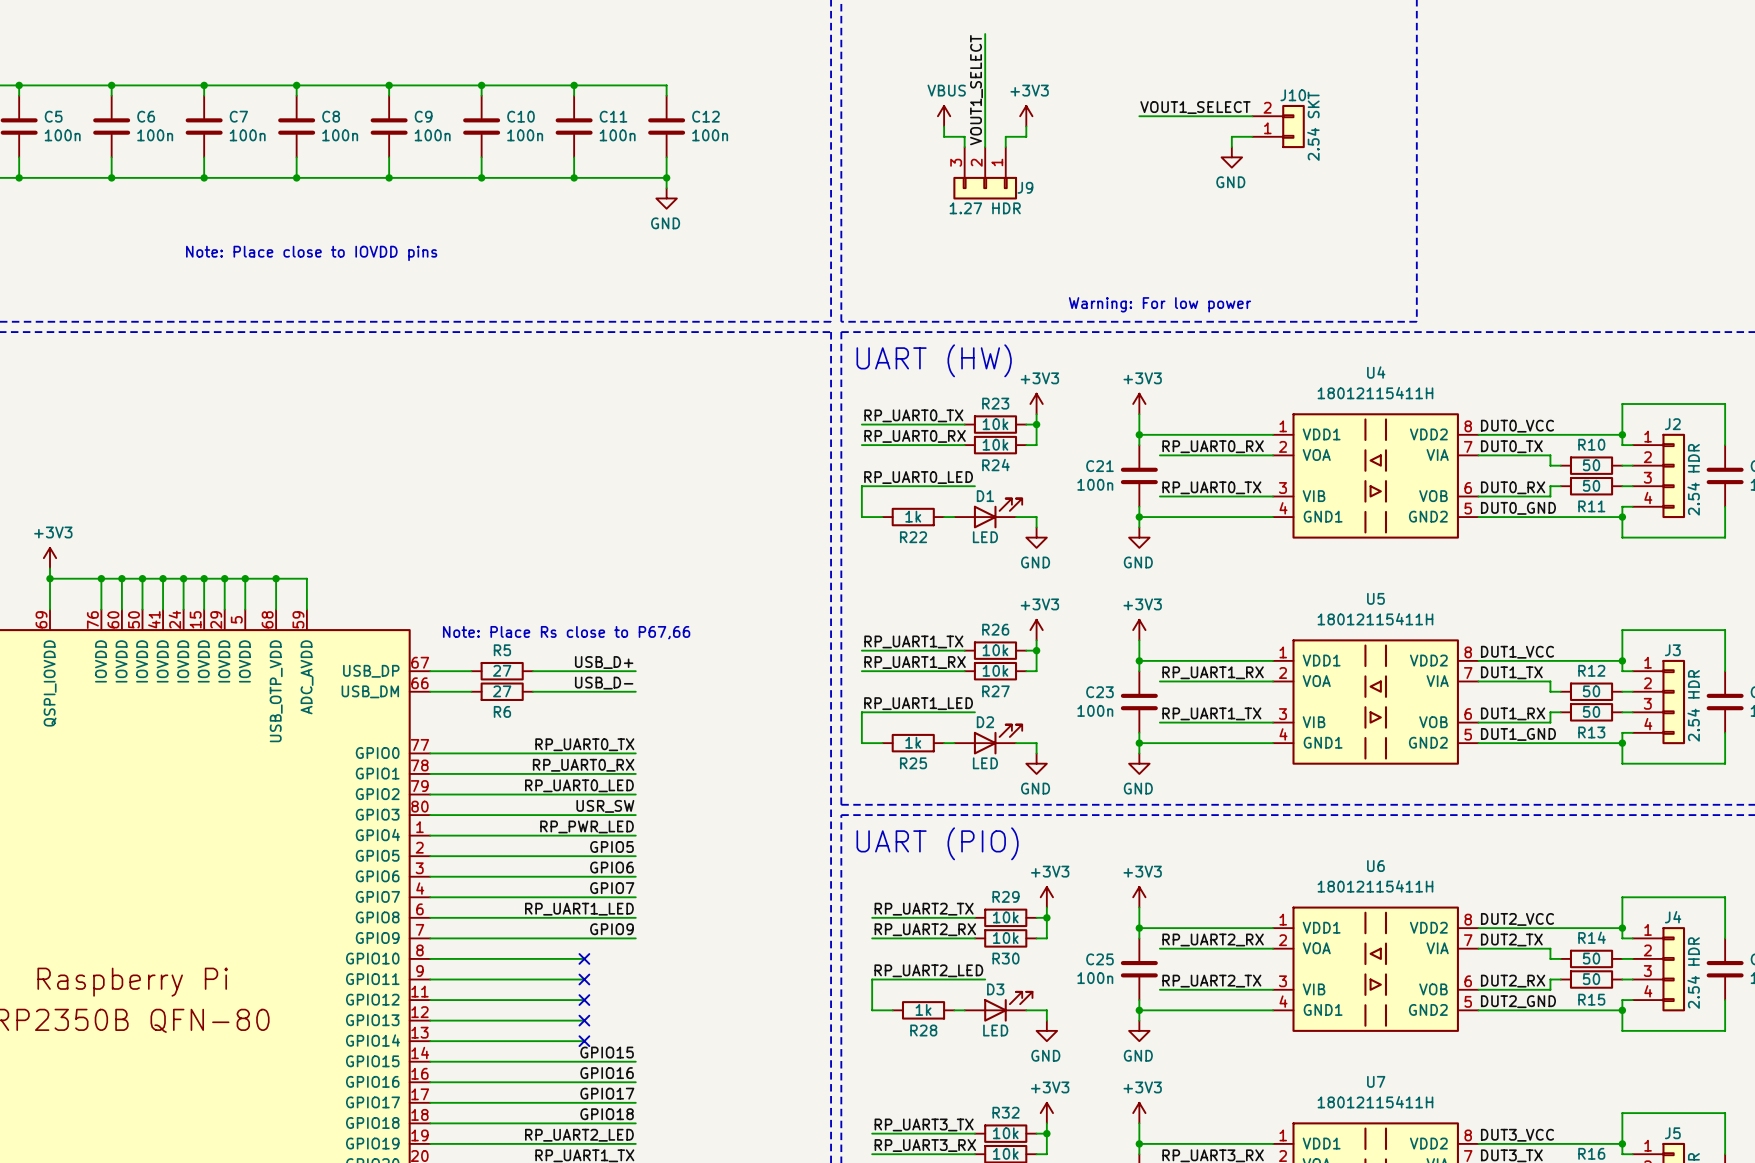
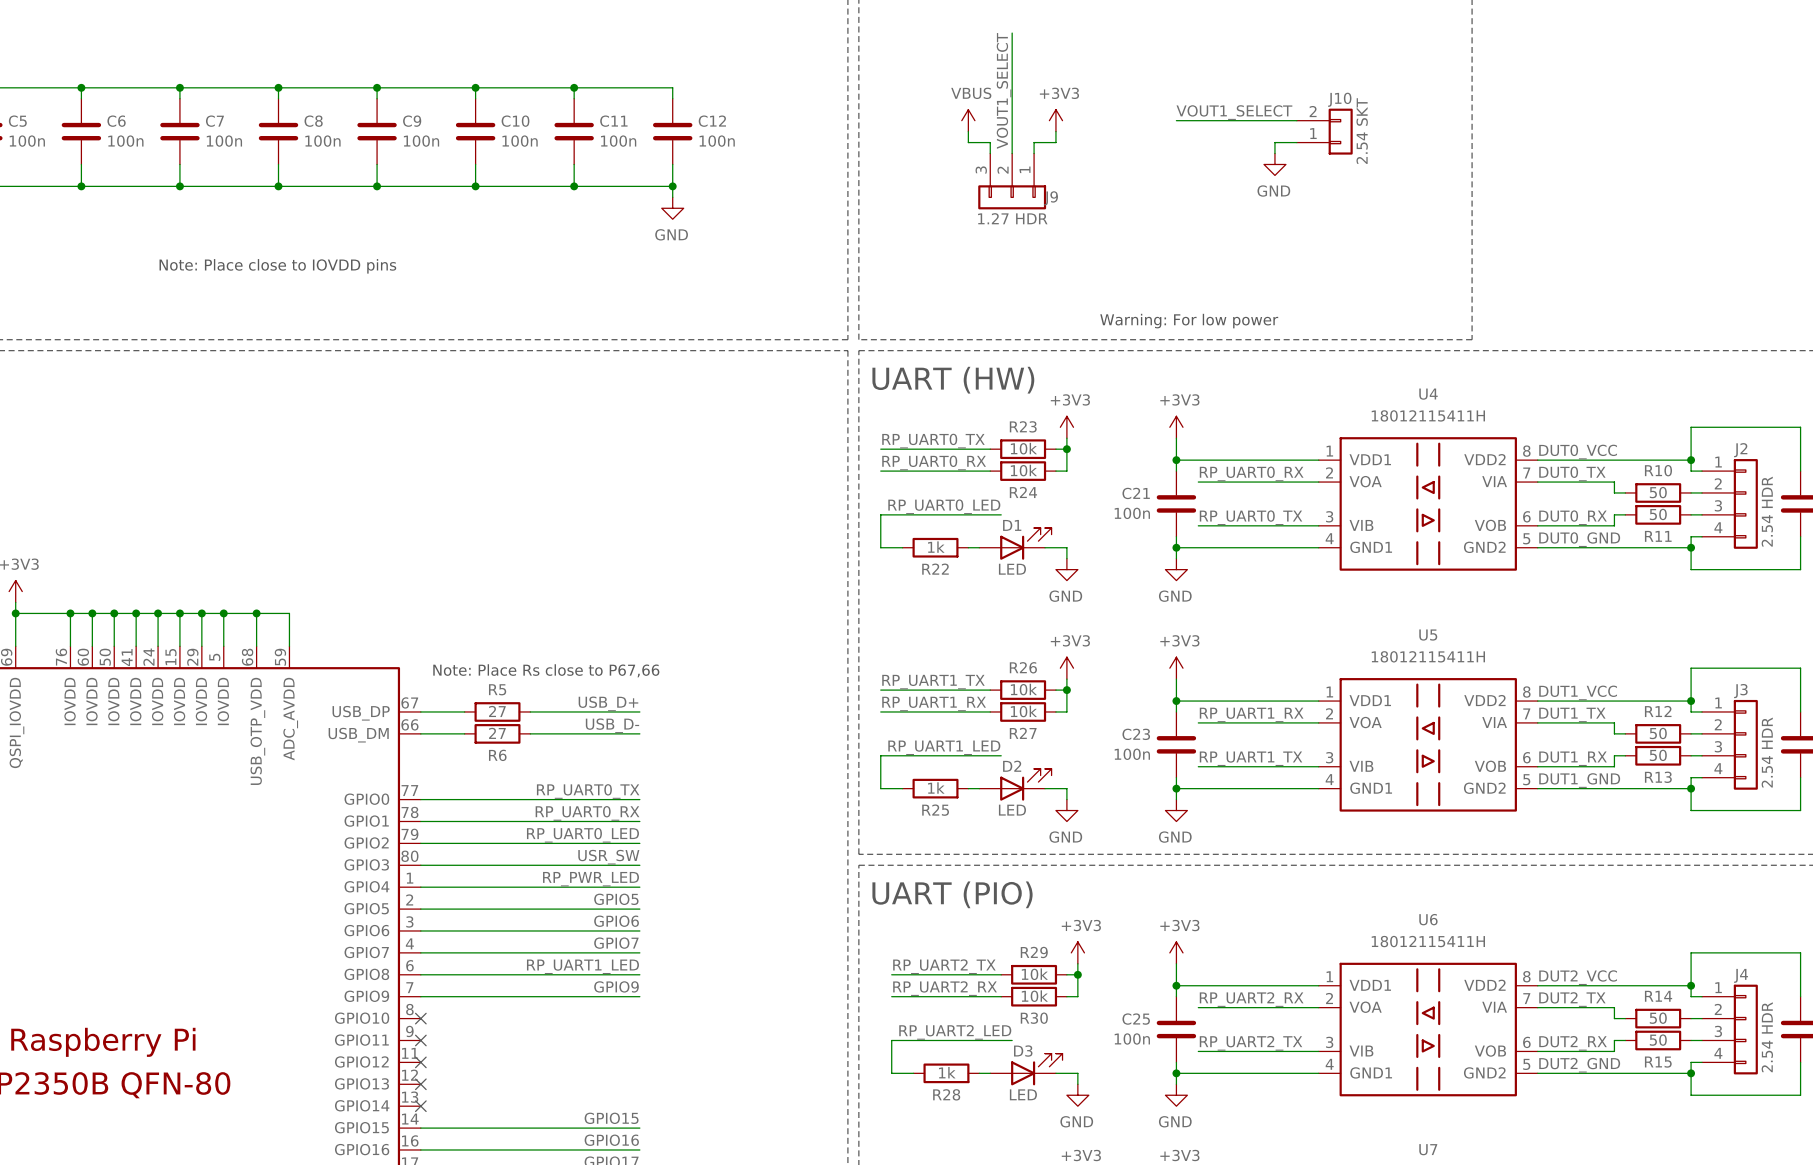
wire: (430, 958) (584, 958) -> none
no-connect mark: none -> (420, 1018)
no-connect mark: (584, 958) -> none
wire: (430, 979) (584, 979) -> none
no-connect mark: none -> (420, 1040)
no-connect mark: (584, 979) -> none
wire: (430, 1000) (584, 1000) -> none
no-connect mark: none -> (420, 1062)
no-connect mark: (584, 1000) -> none
wire: (430, 1020) (584, 1020) -> none
no-connect mark: none -> (420, 1084)
no-connect mark: (584, 1020) -> none
wire: (430, 1041) (584, 1041) -> none
no-connect mark: none -> (420, 1106)
no-connect mark: (584, 1041) -> none

